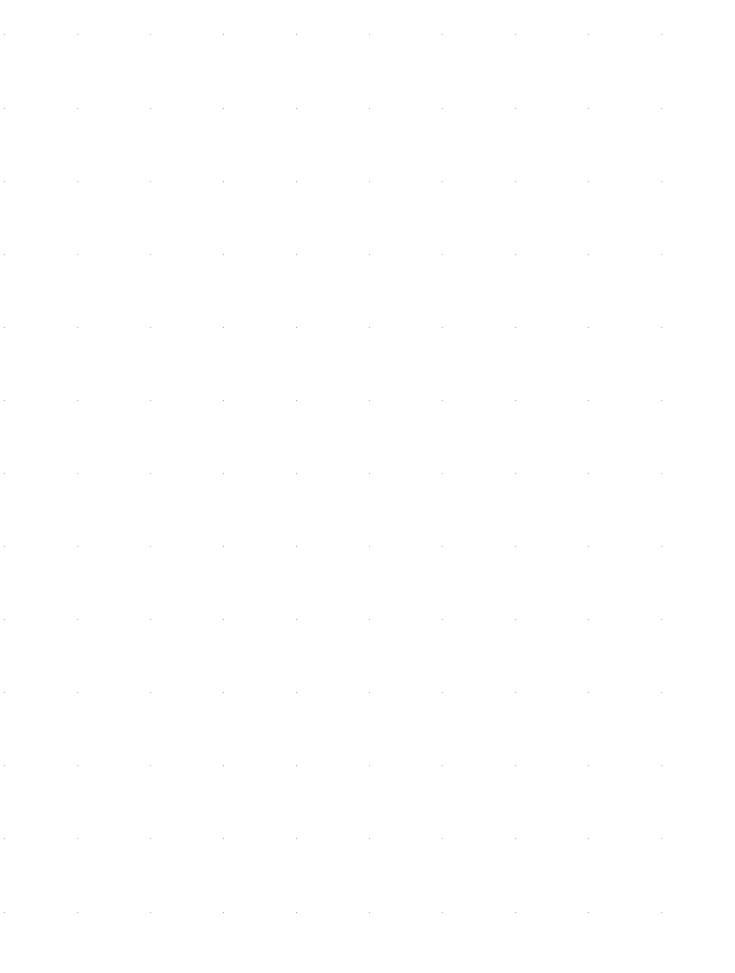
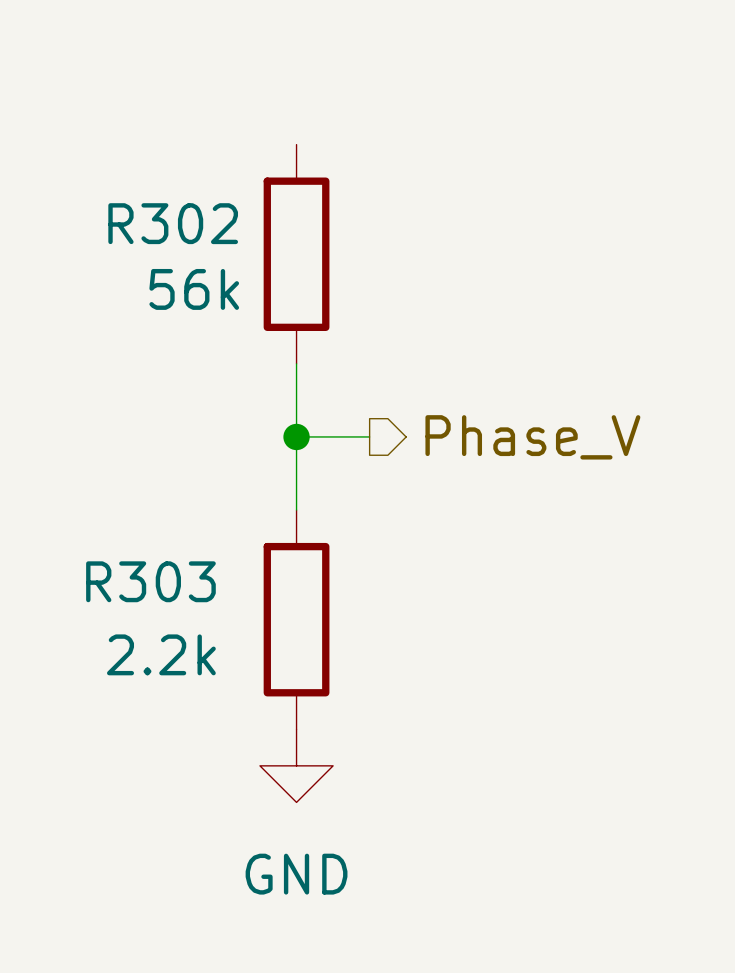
R302: none -> 56k (296, 254)
wire: none -> (296, 363) (296, 510)
wire: none -> (296, 436) (369, 436)
junction: none -> (296, 436)
hierarchical label: none -> Phase_V (532, 437)
R303: none -> 2.2k (296, 619)
power symbol: none -> GND (296, 765)

